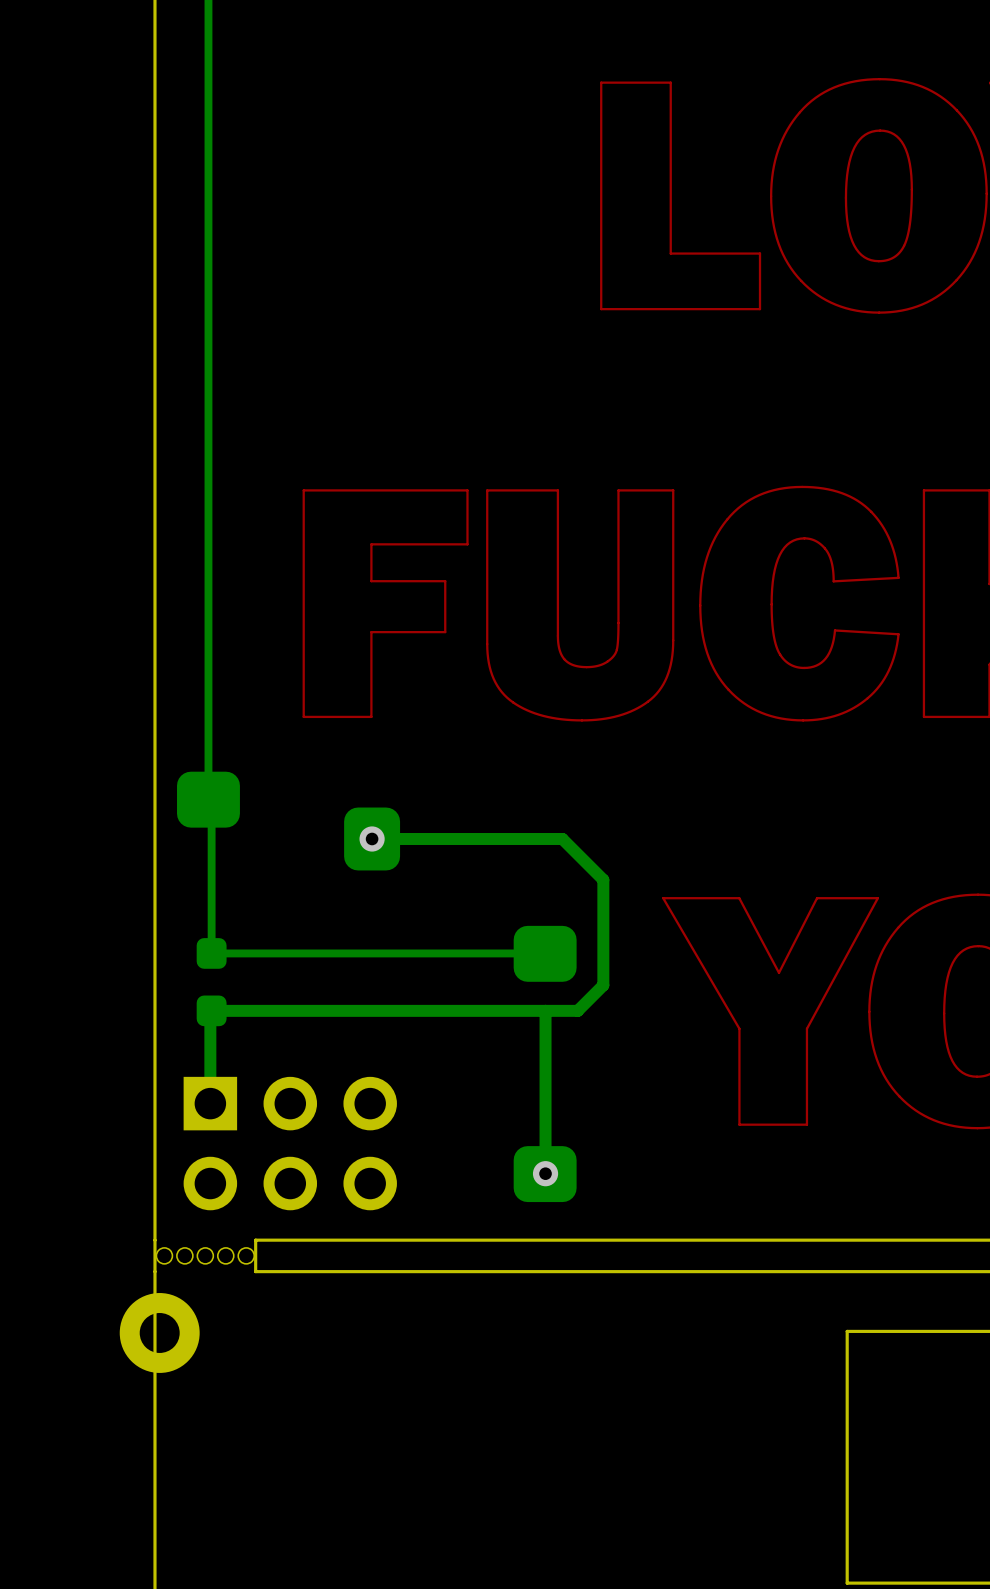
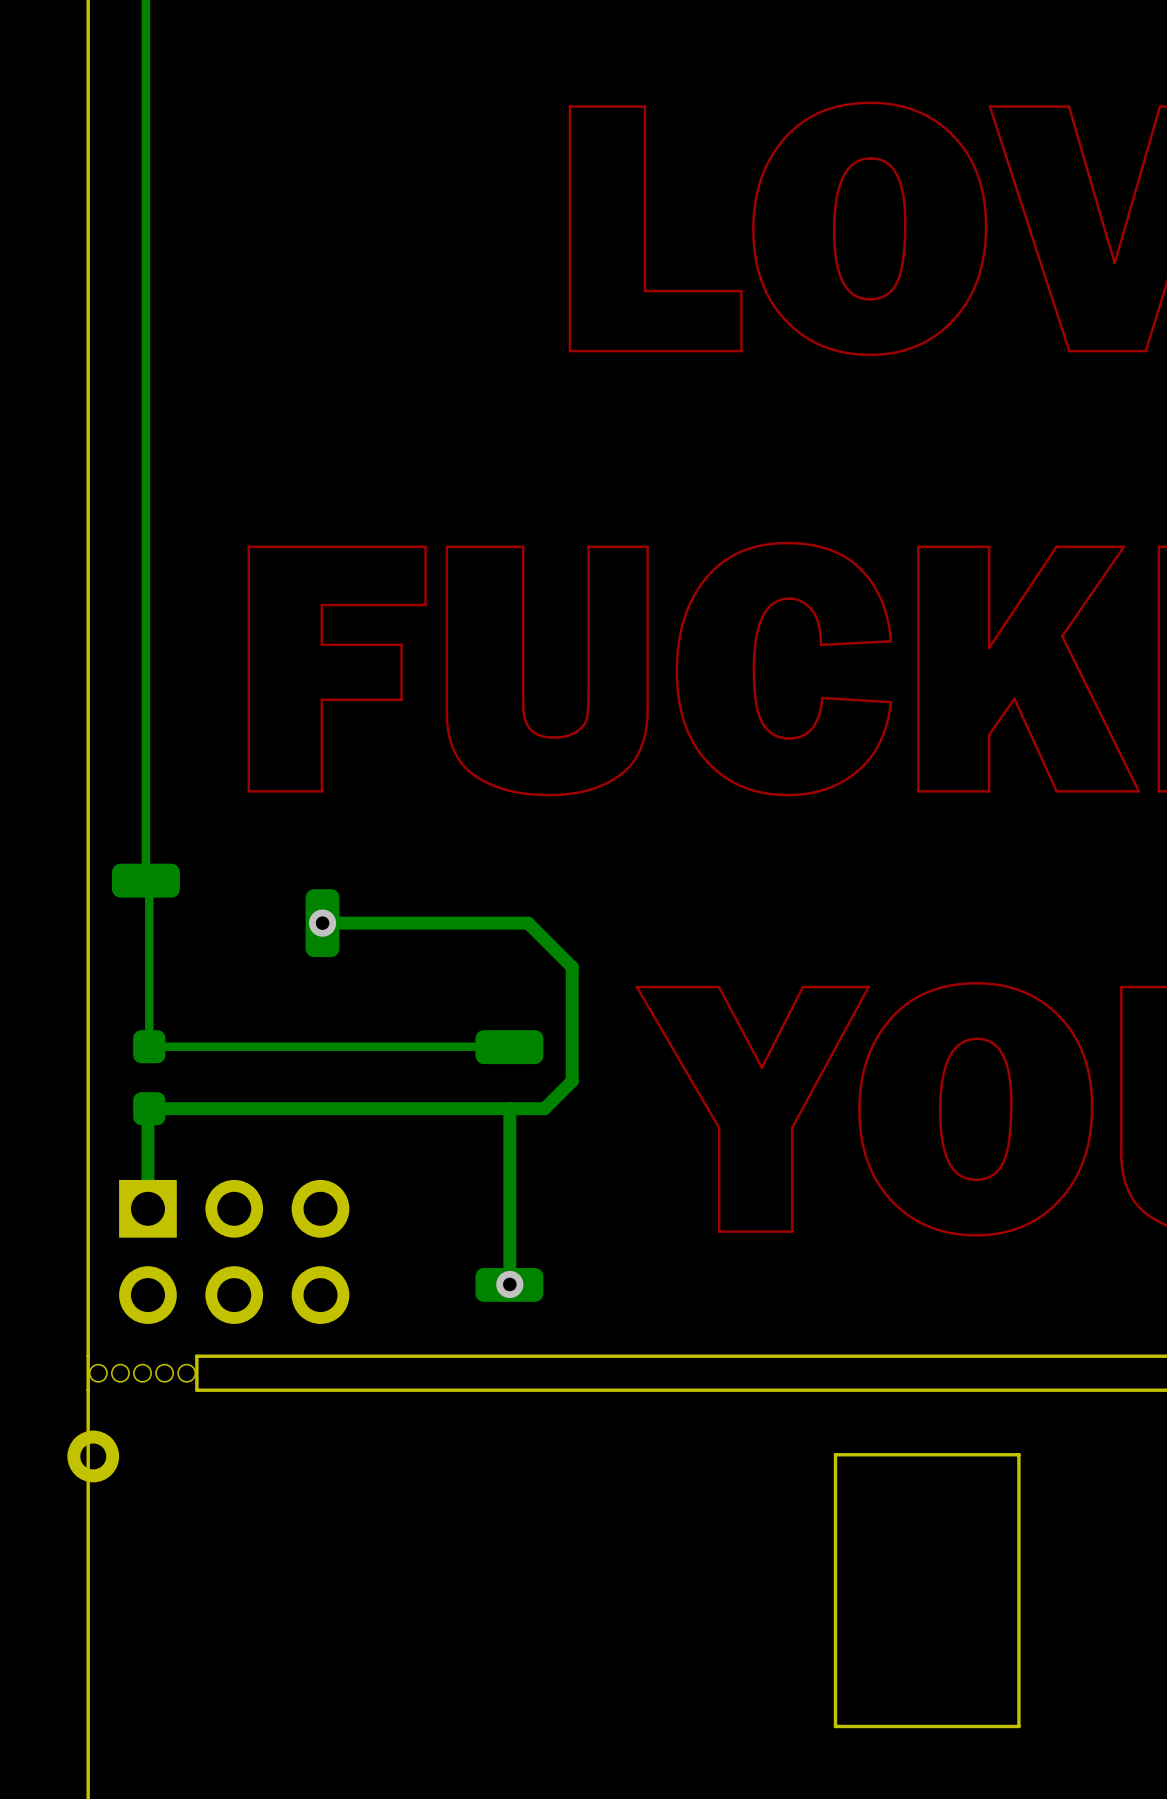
part footprint: [177, 771, 240, 828] -> [111, 863, 180, 898]
part footprint: [344, 807, 401, 871] -> [305, 889, 340, 958]
part footprint: [513, 925, 577, 982] -> [475, 1030, 544, 1065]
part footprint: [513, 1146, 577, 1203] -> [475, 1267, 544, 1302]
part footprint: [119, 1293, 200, 1373] -> [67, 1430, 120, 1483]

